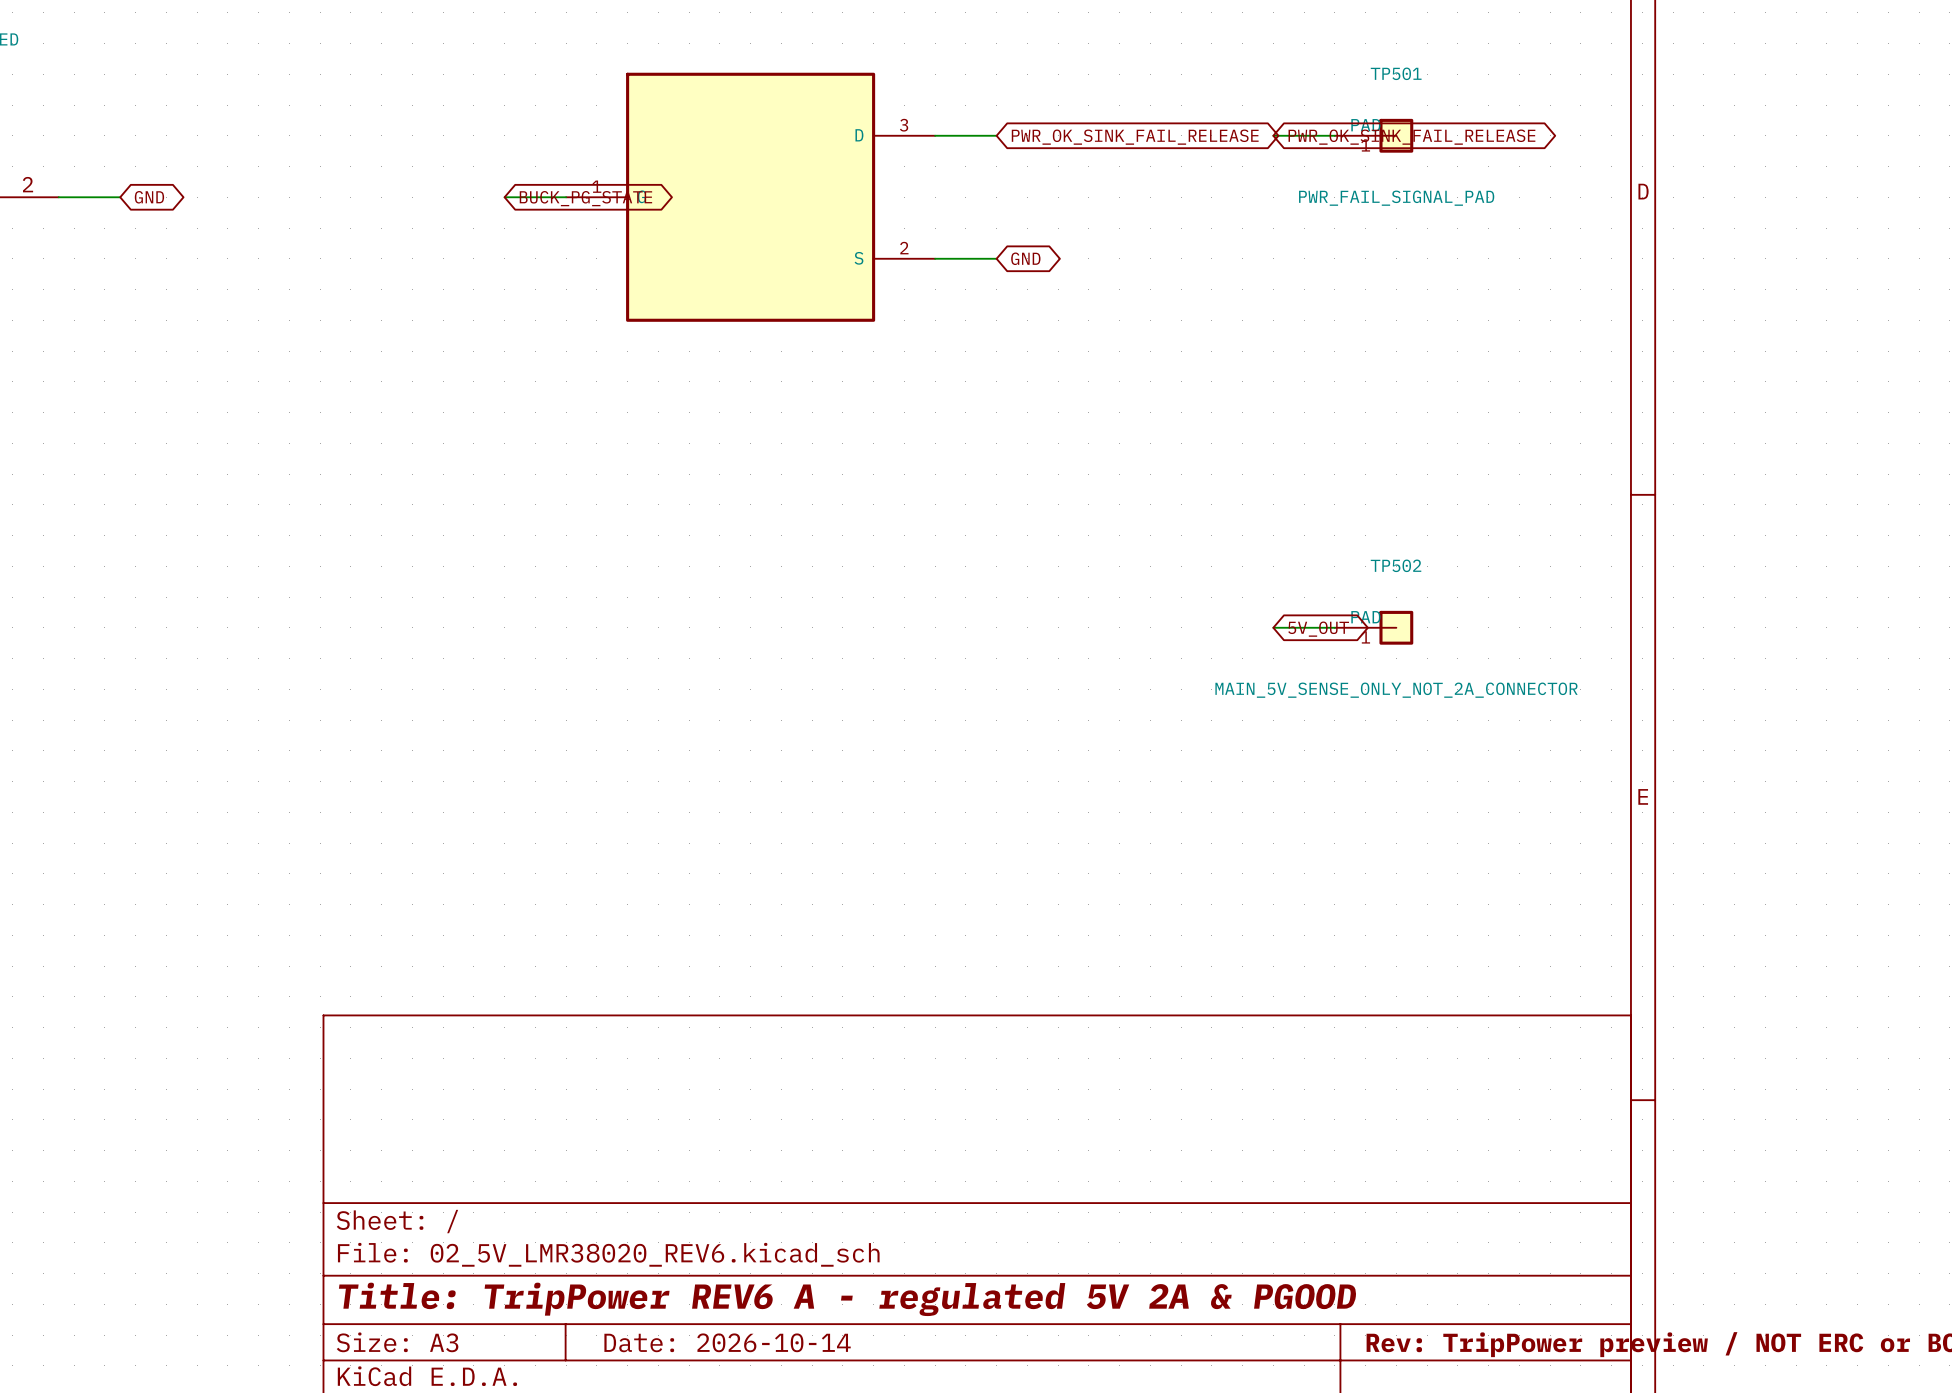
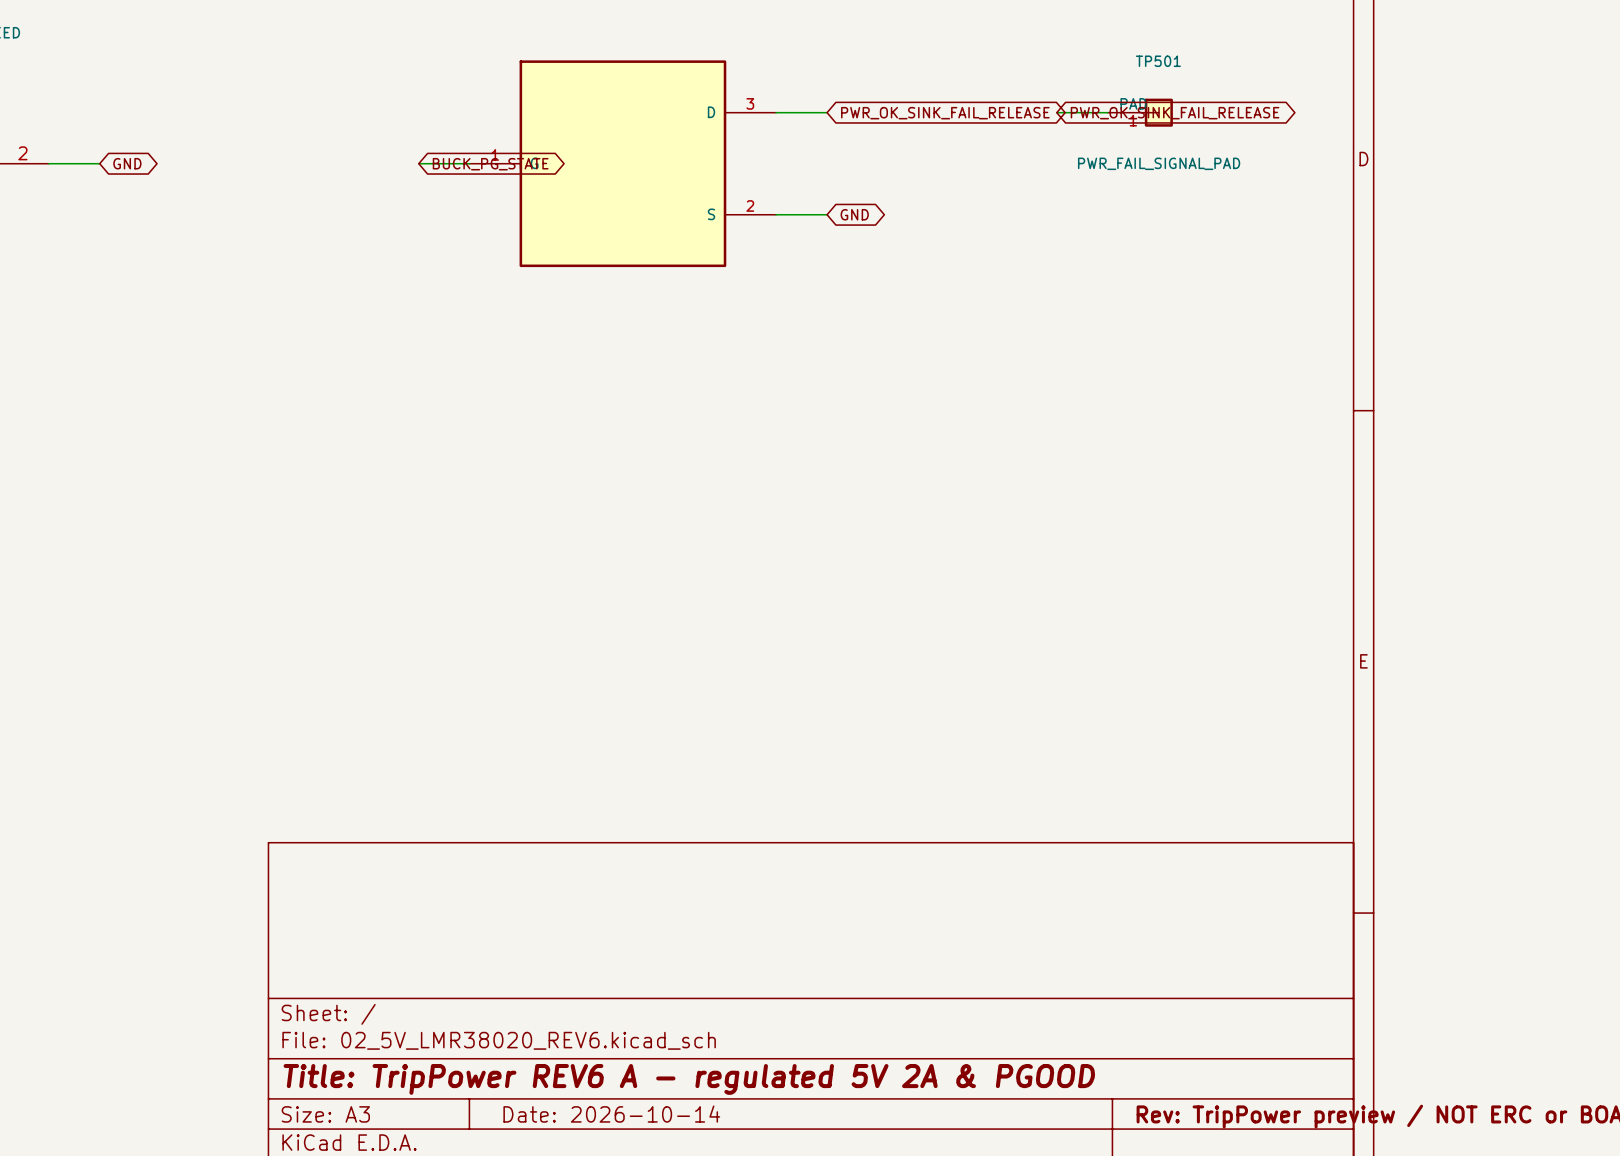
wire: (1273, 627) (1334, 627) -> none
TP502: MAIN_5V_SENSE_ONLY_NOT_2A_CONNECTOR (1374, 627) -> none
global label: 5V_OUT (1318, 629) -> none

